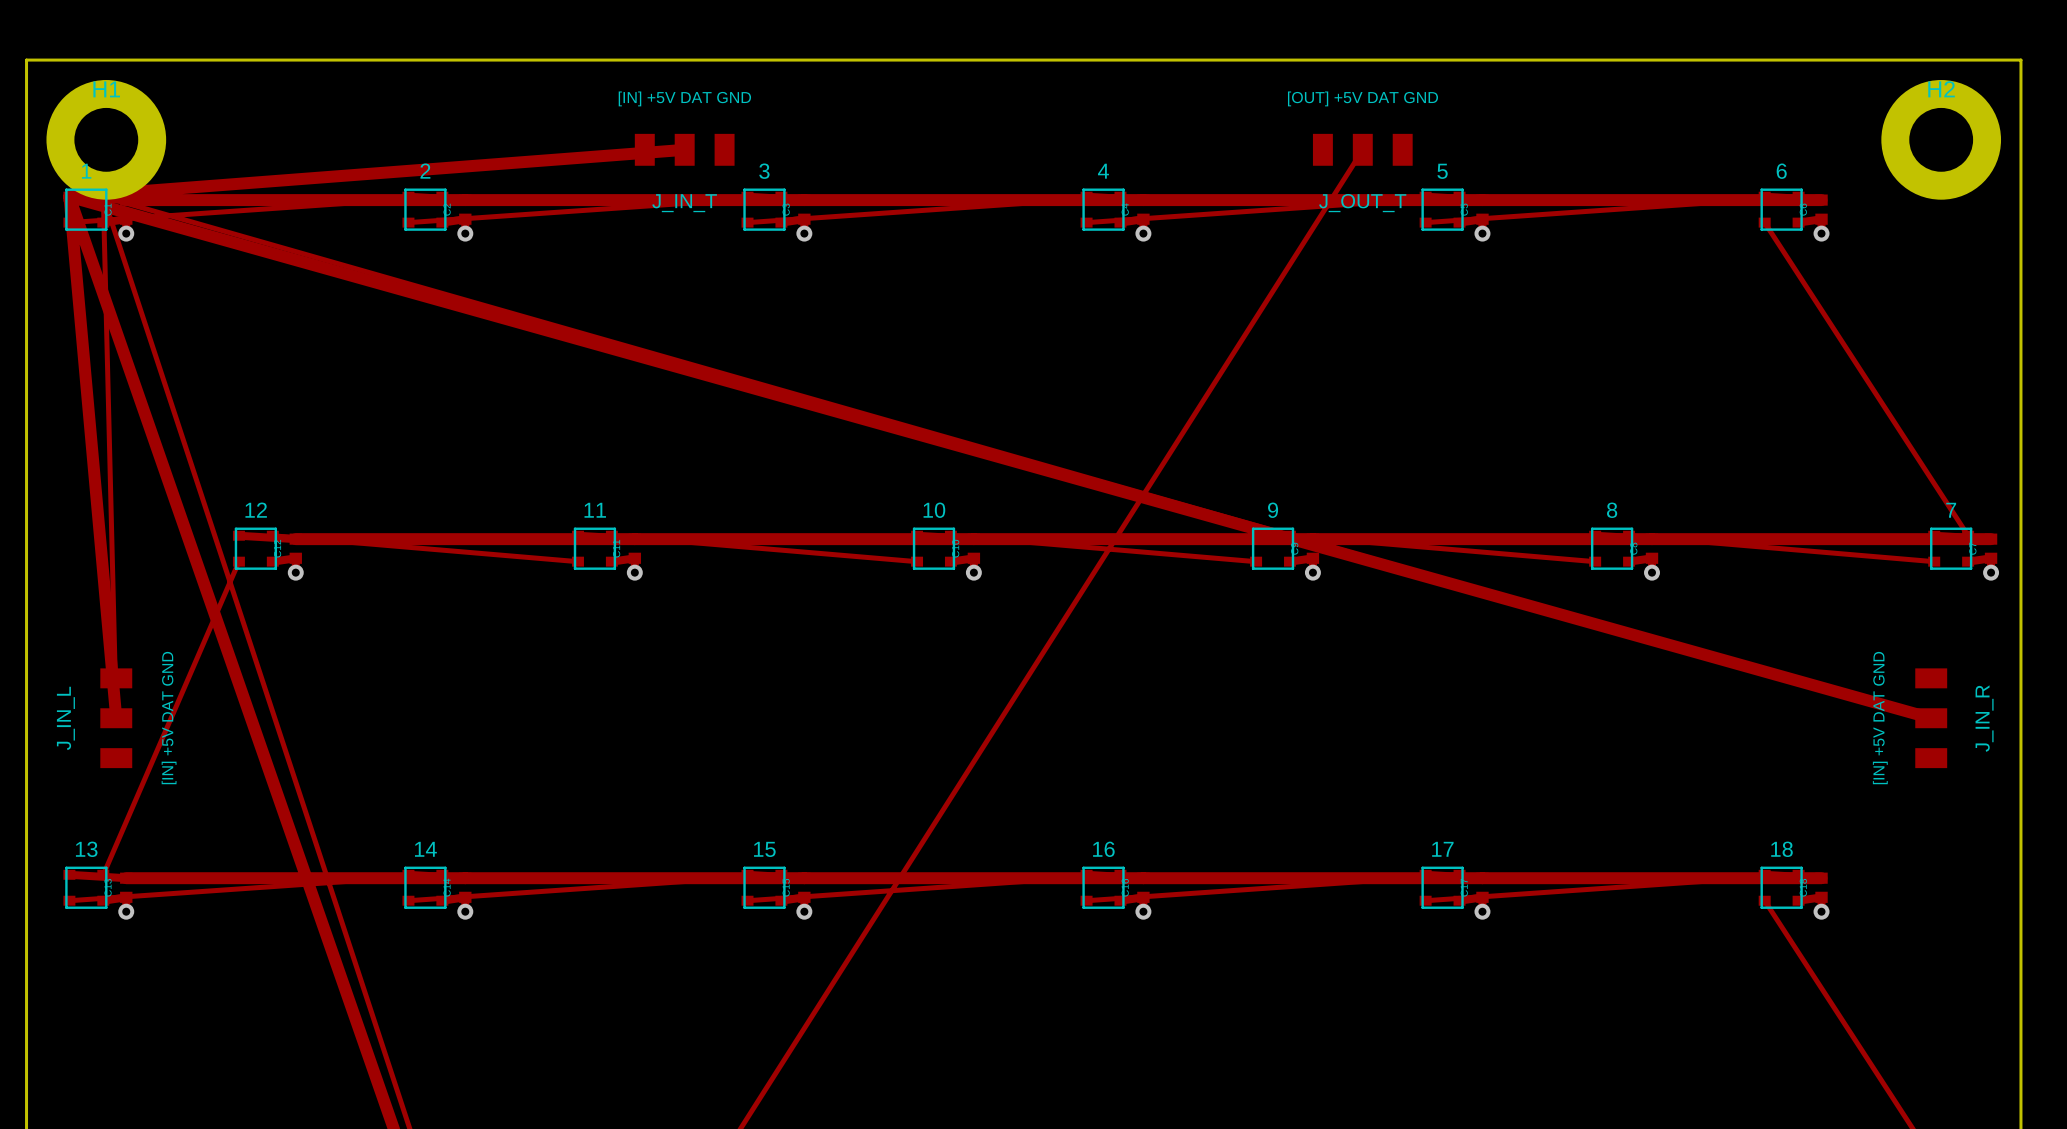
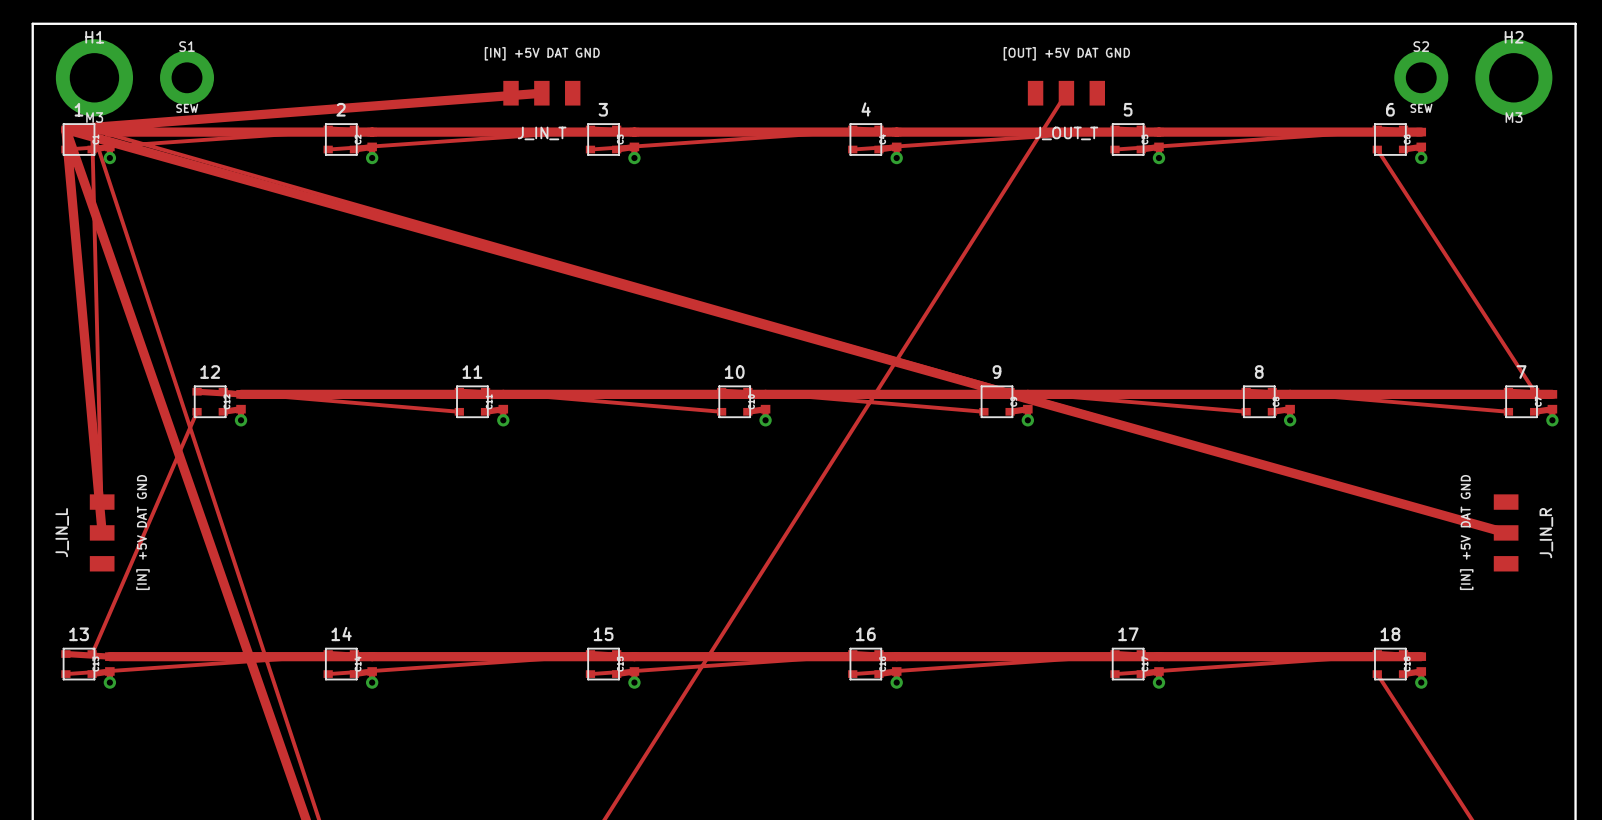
H1 footprint: [46, 80, 167, 200] -> [55, 39, 134, 117]
H2 footprint: [1881, 80, 2002, 200] -> [1475, 39, 1553, 117]
S1: none -> (187, 77)
S2: none -> (1421, 77)

